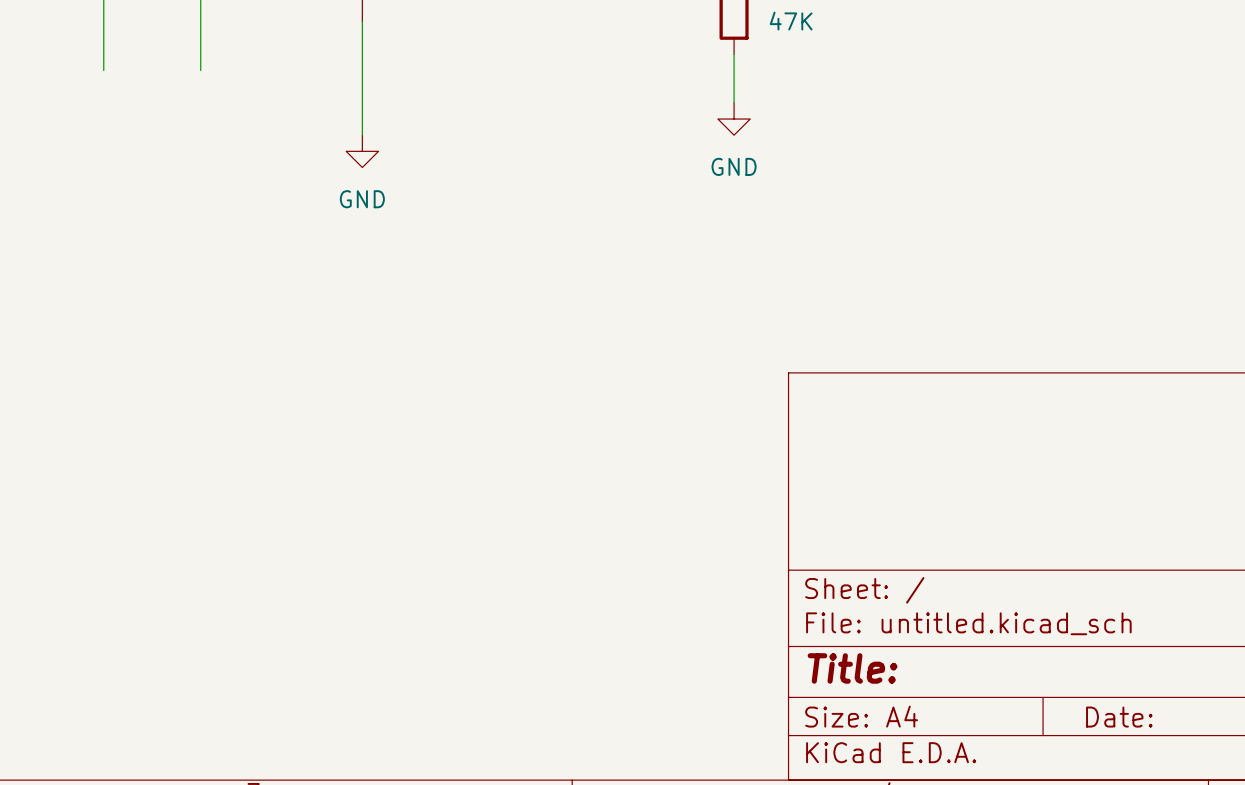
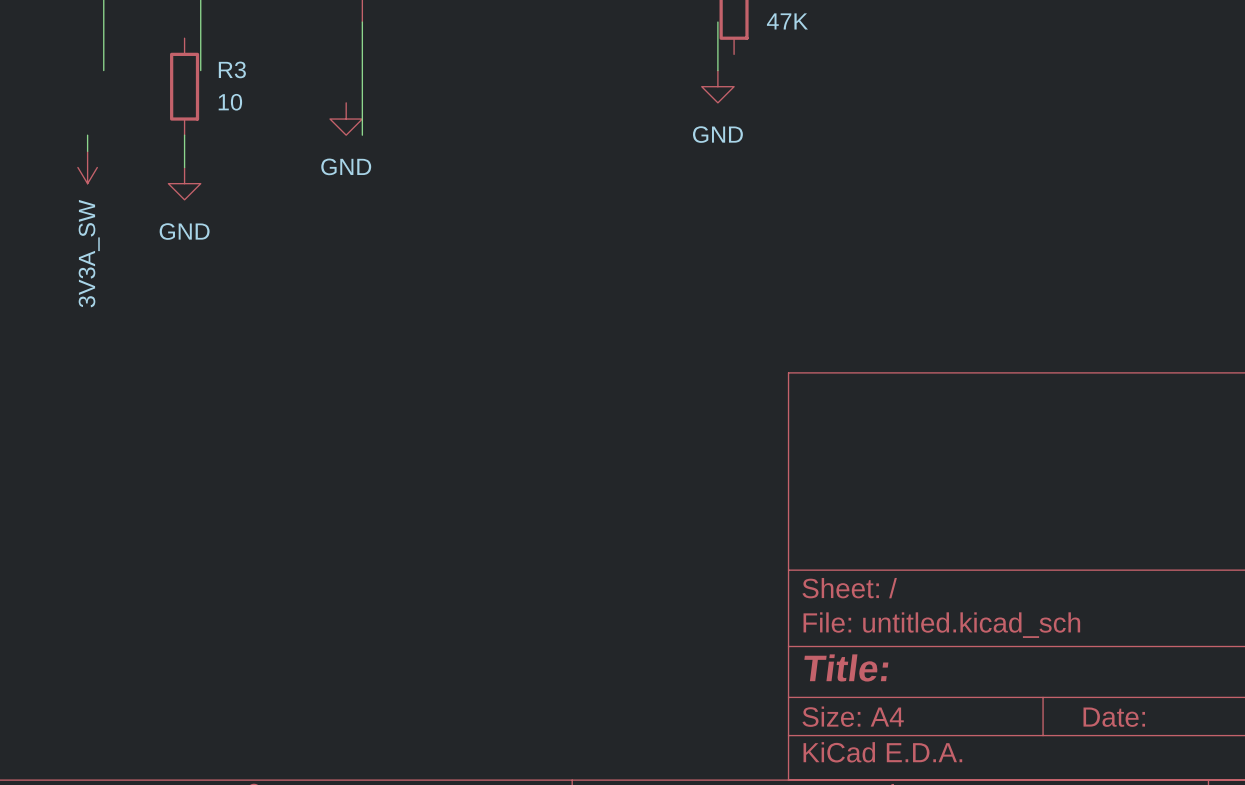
wire: (734, 54) (734, 102) -> (717, 22) (717, 70)
R3: none -> 10 (184, 86)
power symbol position: GND (734, 119) -> GND (717, 86)
wire: none -> (87, 135) (87, 151)
wire: none -> (184, 135) (184, 167)
power symbol position: GND (362, 151) -> GND (346, 119)
power symbol: none -> 3V3A_SW (87, 167)
power symbol: none -> GND (184, 183)

